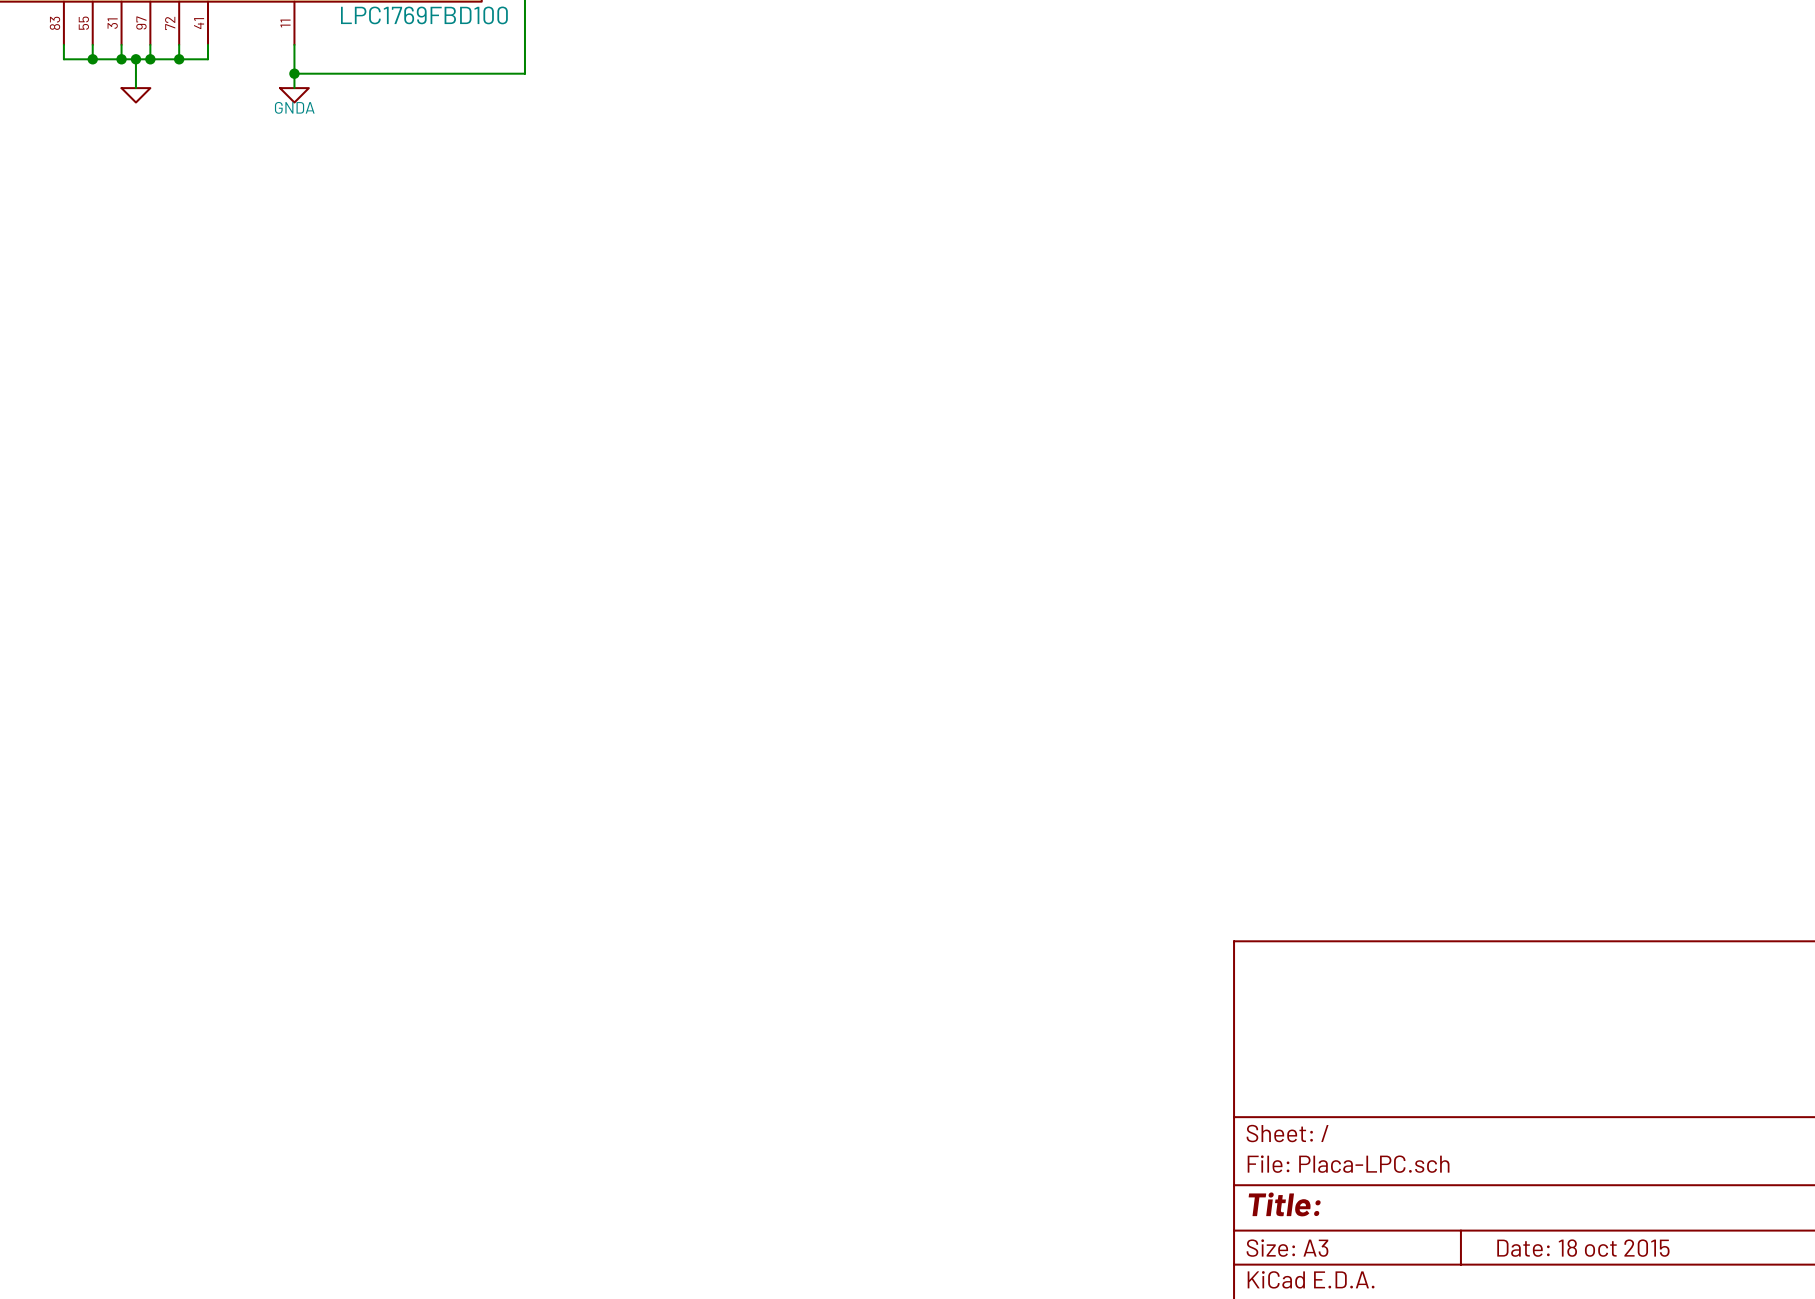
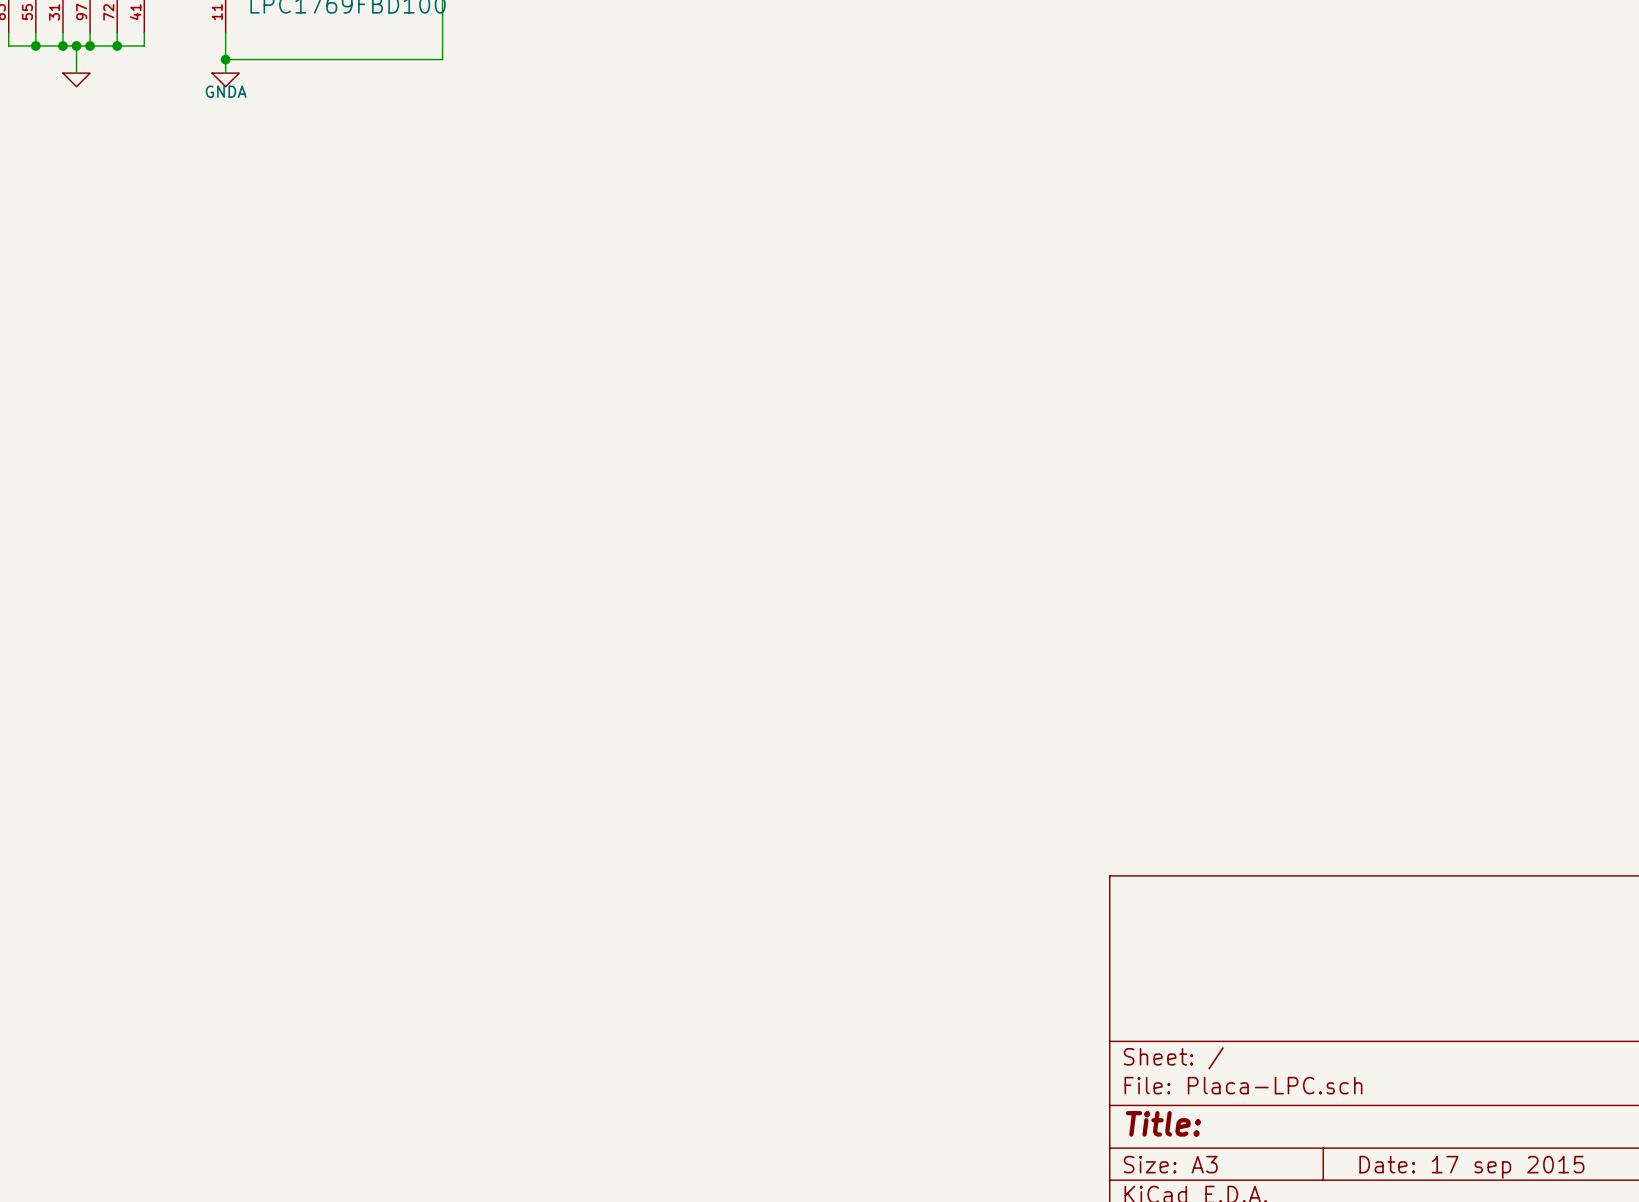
title block: Date: 18 oct 2015 (1583, 1248) -> Date: 17 sep 2015 (1471, 1167)

